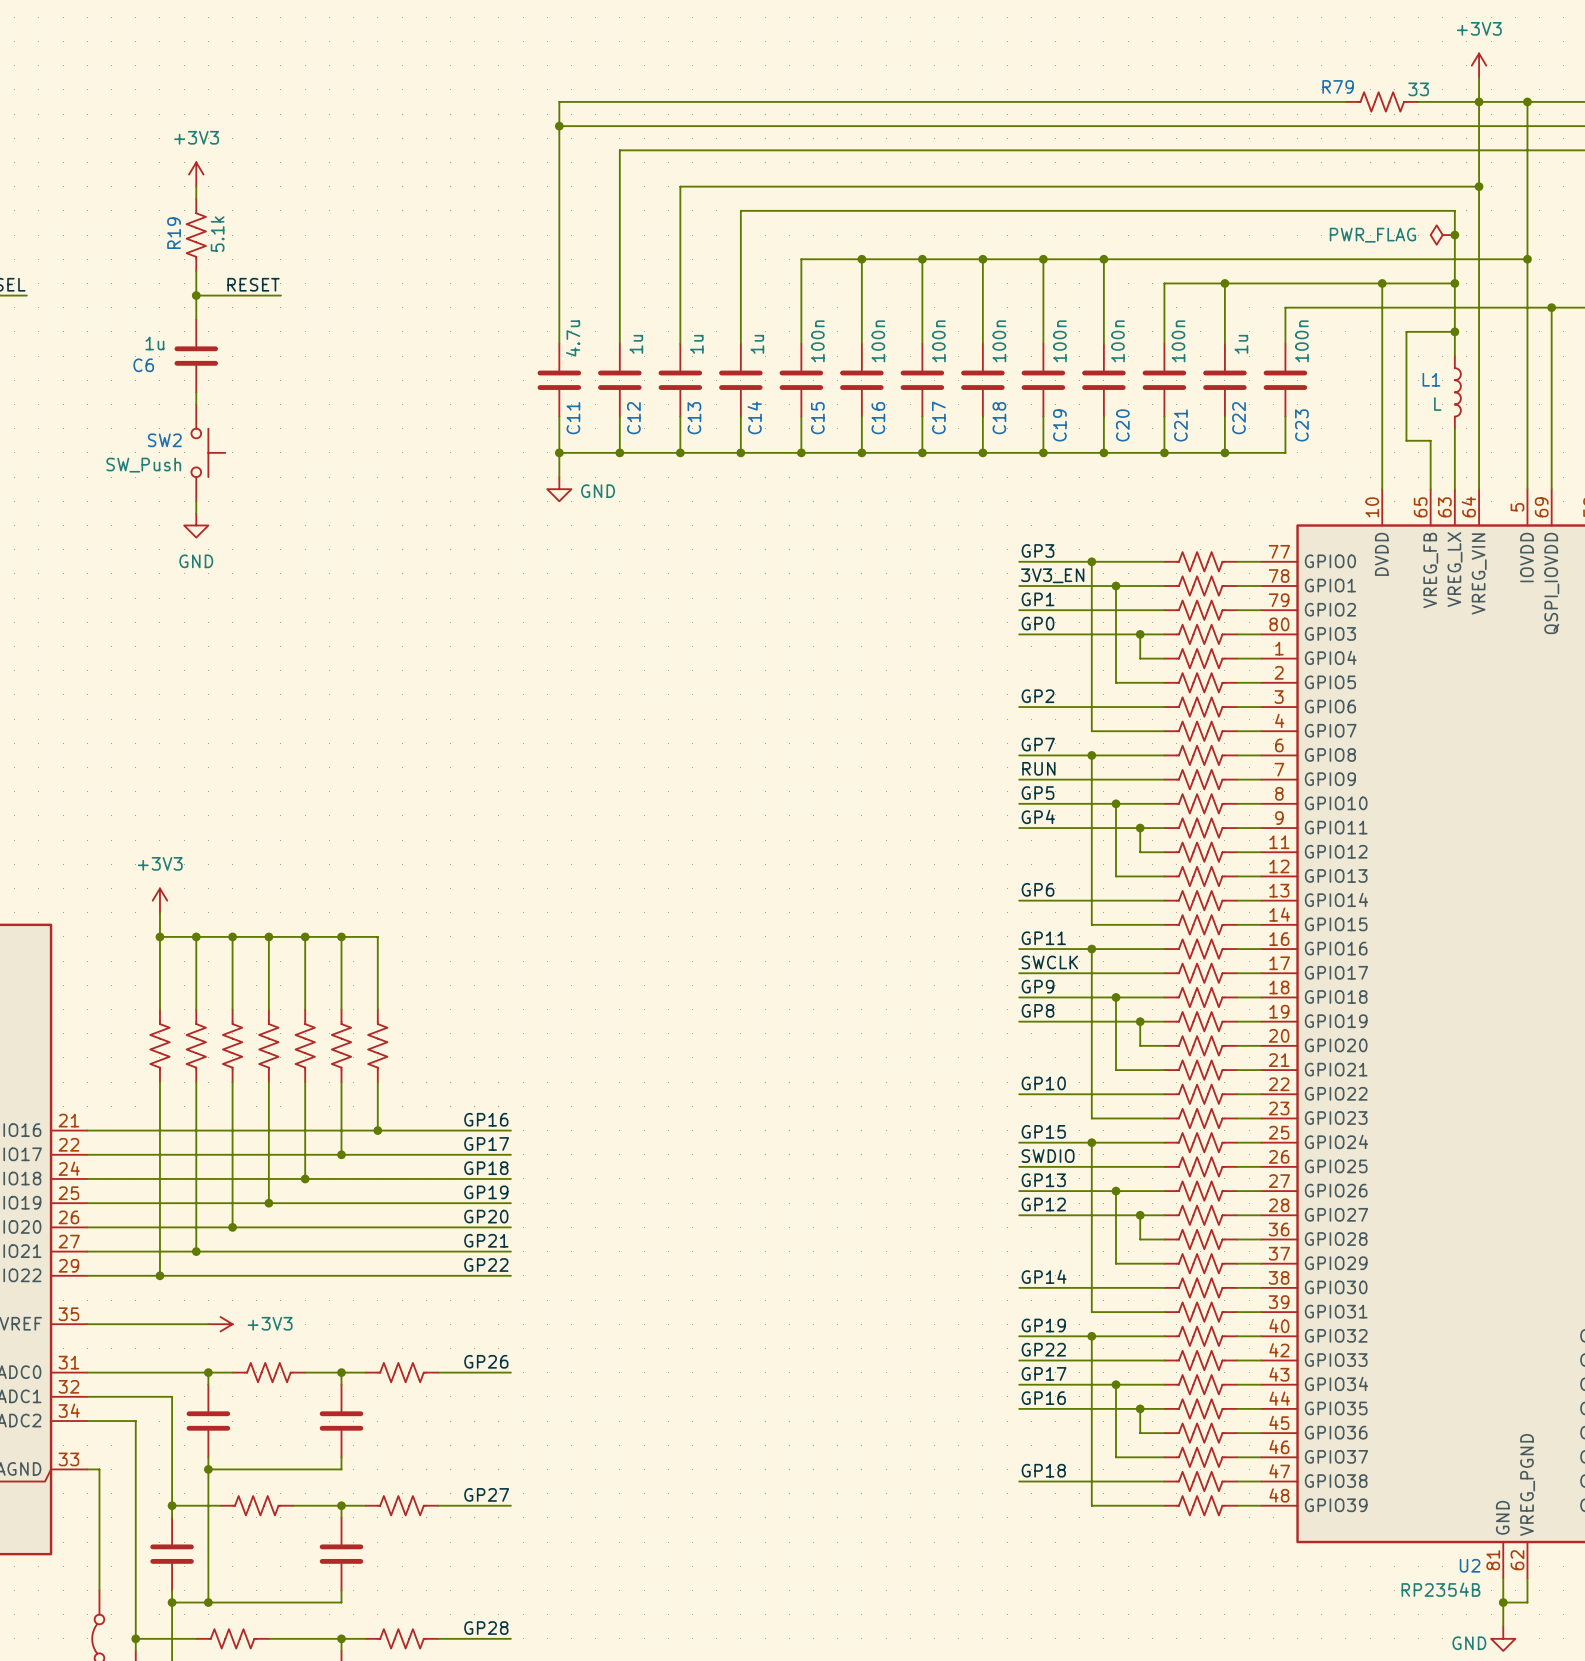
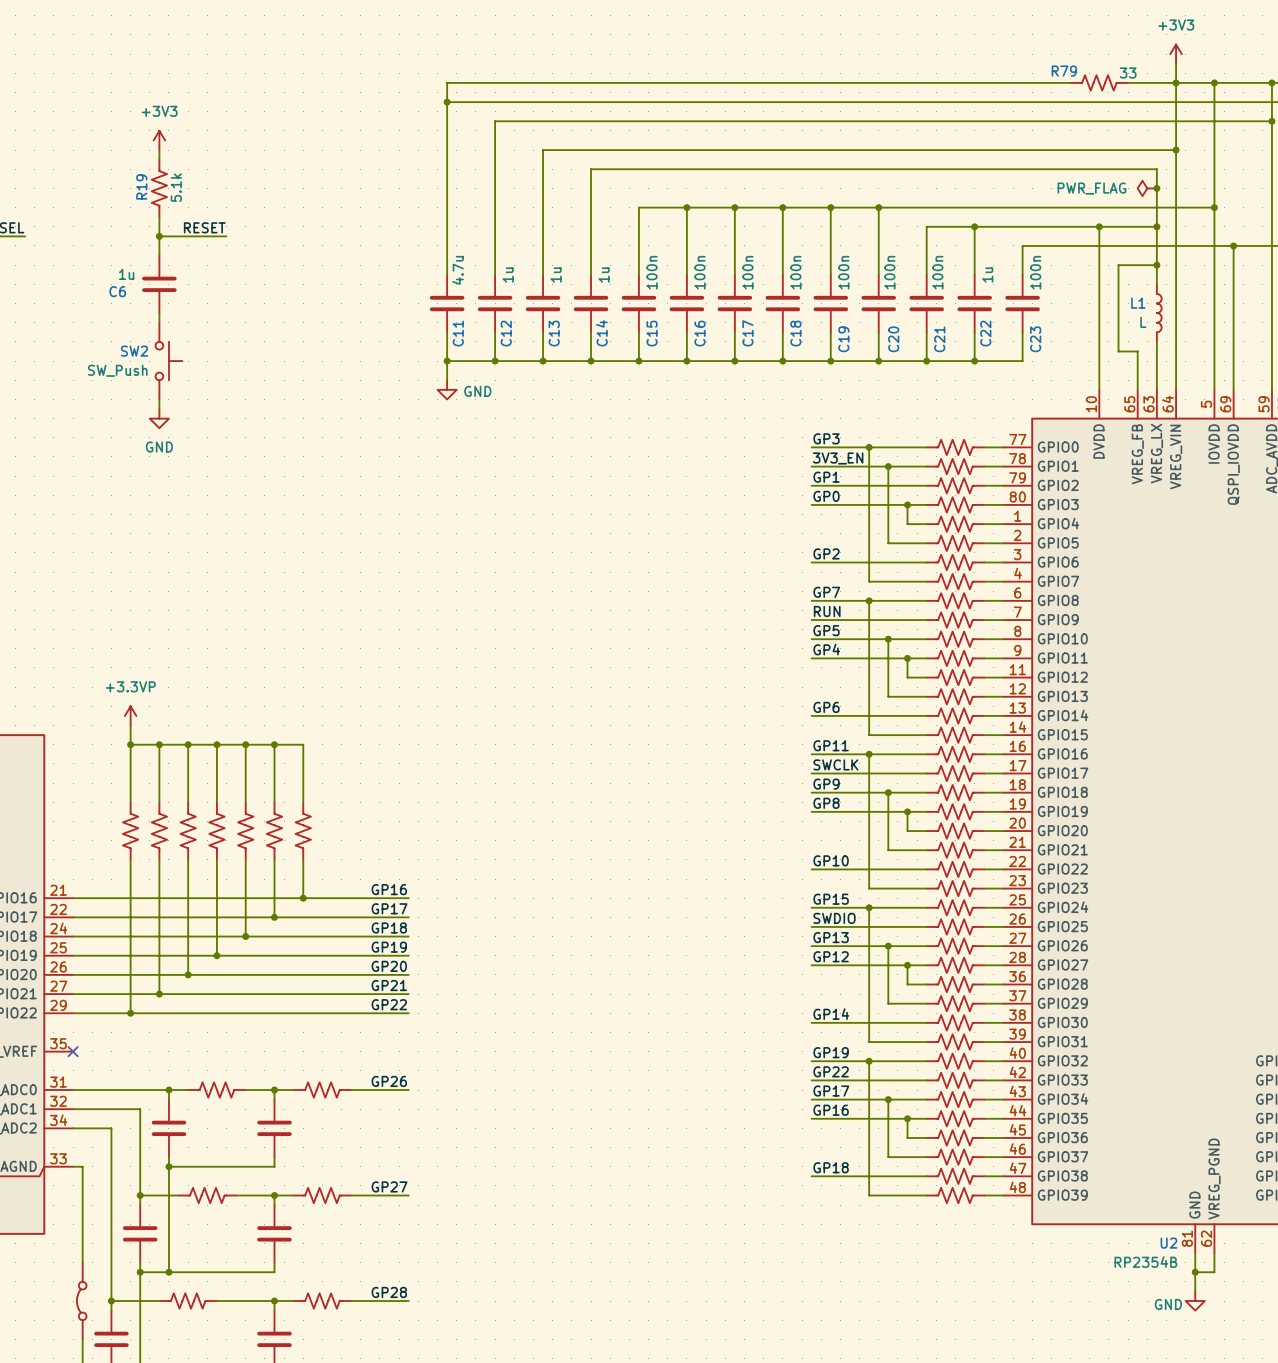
power symbol: +3V3 (159, 900) -> +3.3VP (130, 715)
wire: (87, 1324) (208, 1324) -> none
no-connect mark: none -> (73, 1051)
power symbol: +3V3 (220, 1324) -> none

